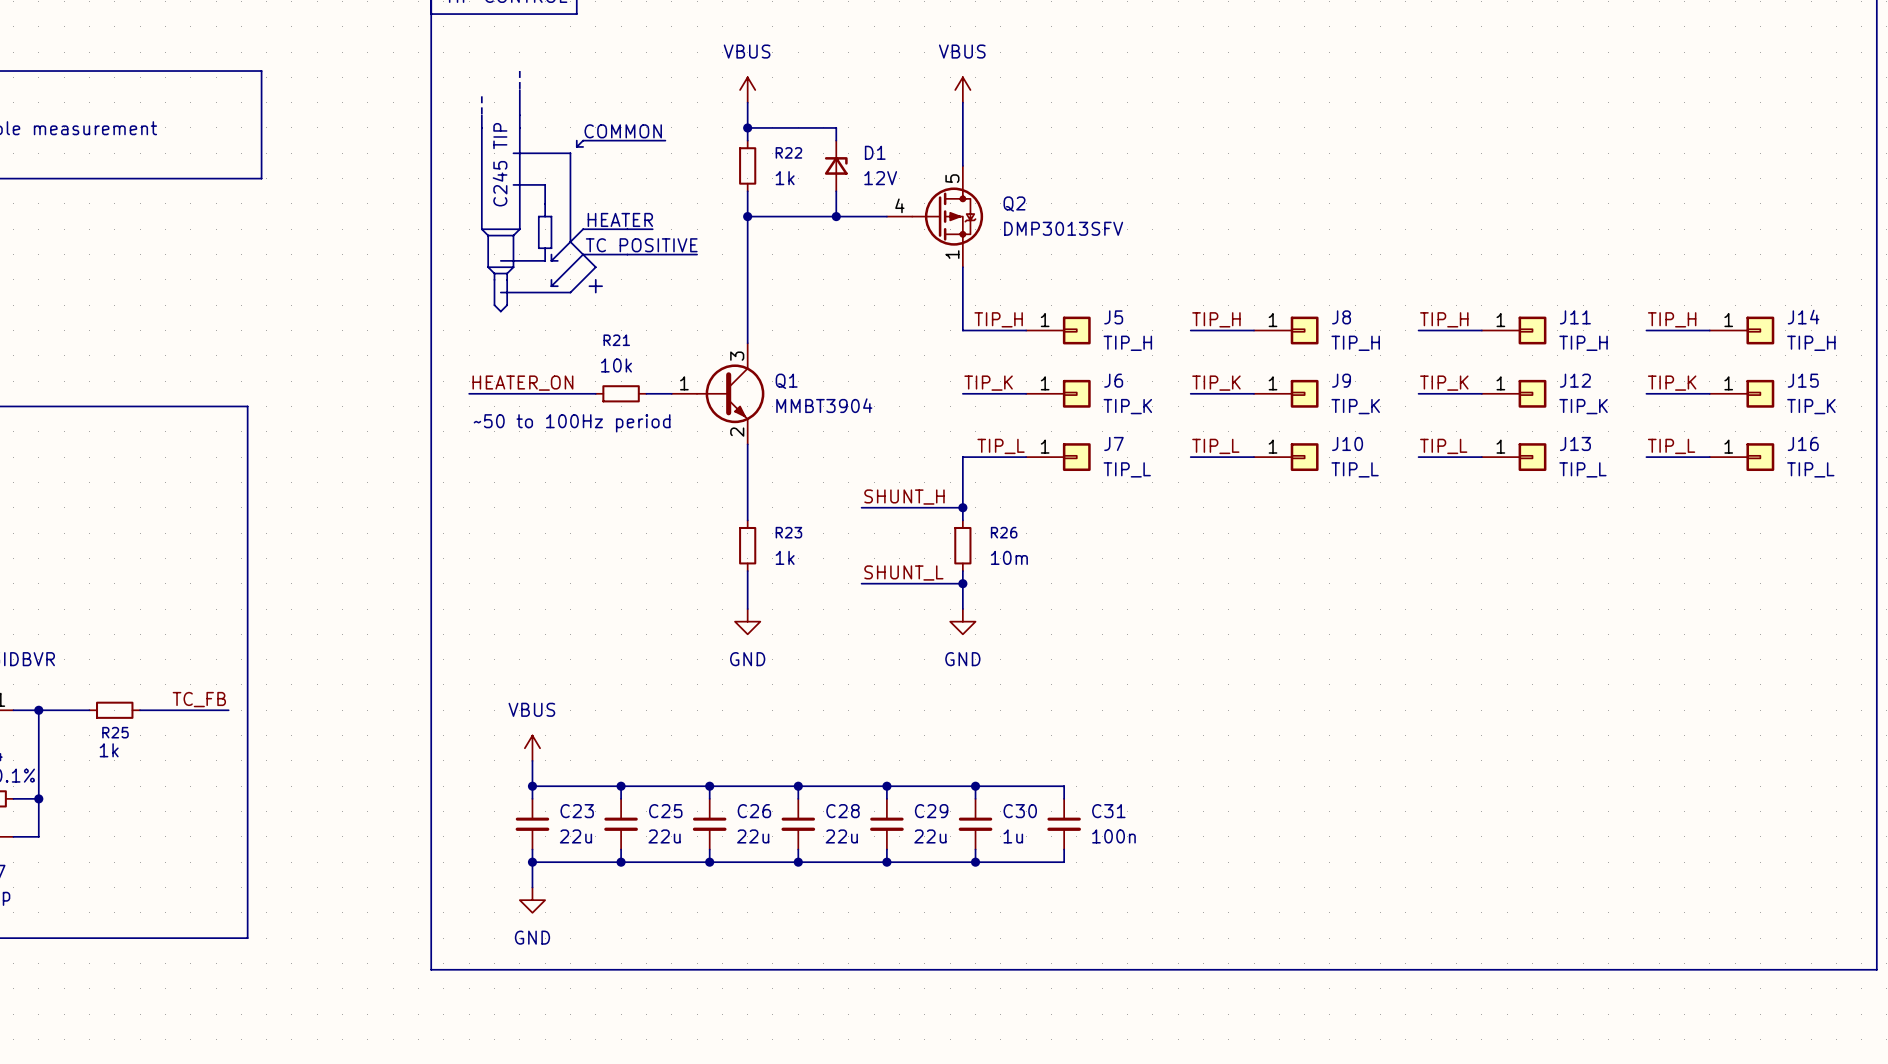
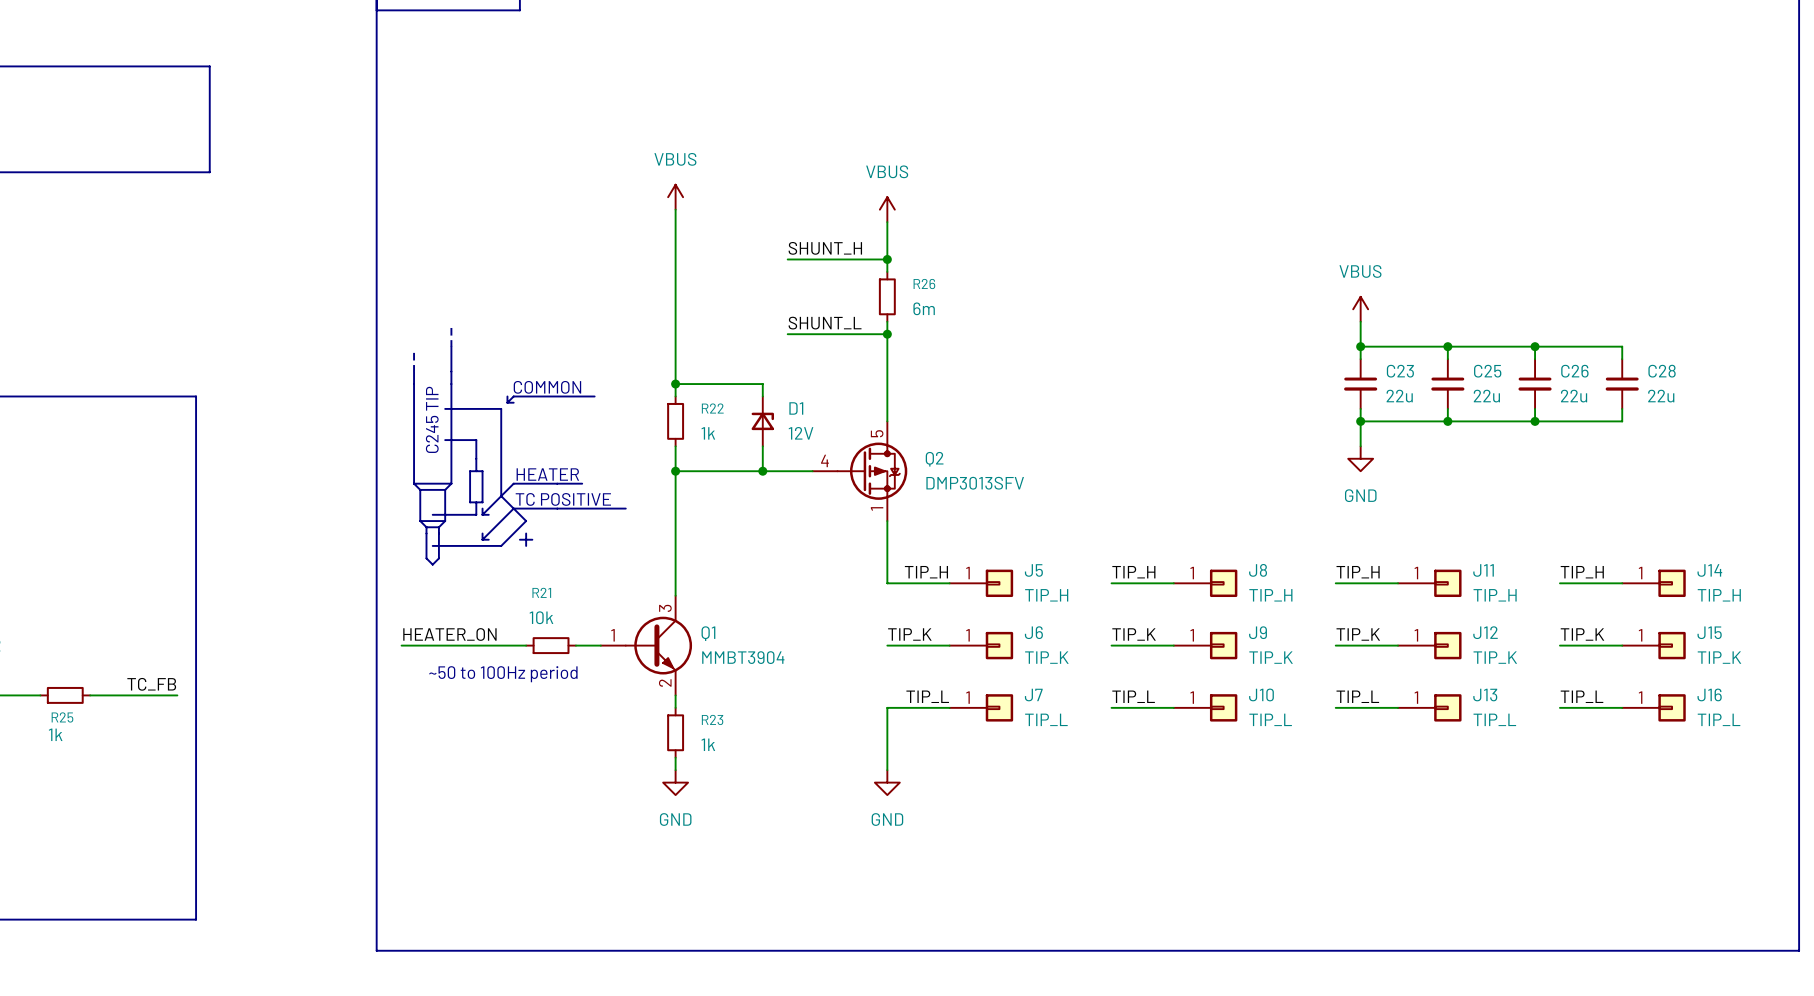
line: (519, 71) (519, 229) -> none
power symbol position: VBUS (747, 89) -> VBUS (675, 197)
power symbol: VBUS (962, 89) -> none
line: (481, 96) (481, 229) -> none
wire: (747, 102) (747, 140) -> none
wire: (962, 102) (962, 165) -> none
wire: (747, 127) (836, 127) (836, 140) -> none
junction: (747, 127) -> none
text: COMMON (623, 131) -> none
line: (576, 140) (576, 146) -> none
line: (665, 140) (583, 140) (576, 146) -> none
line: (576, 146) (583, 146) -> none
line: (513, 153) (570, 153) (570, 241) (595, 267) (570, 292) (500, 292) -> none
text: C245 TIP (500, 164) -> none
R22 position: (747, 165) -> (675, 421)
D1 position: (836, 165) -> (762, 421)
line: (513, 184) (545, 184) (545, 216) -> none
wire: (747, 191) (747, 343) -> none
wire: (836, 191) (836, 216) -> none
line: (538, 216) (538, 248) (551, 248) (551, 216) (538, 216) -> none
wire: none -> (675, 209) (675, 396)
wire: (747, 216) (886, 216) -> none
junction: (747, 216) -> none
junction: (836, 216) -> none
Q2 position: (935, 216) -> (859, 471)
power symbol: none -> VBUS (887, 209)
text: HEATER (620, 219) -> none
line: (481, 229) (519, 229) -> none
line: (481, 229) (488, 235) -> none
line: (519, 229) (513, 235) -> none
line: (652, 229) (583, 229) (551, 260) -> none
wire: none -> (887, 222) (887, 271)
line: (488, 235) (488, 267) -> none
line: (488, 235) (513, 235) -> none
line: (513, 235) (513, 267) -> none
text: TC POSITIVE (641, 245) -> none
line: (545, 248) (545, 260) (500, 260) -> none
line: (551, 254) (551, 260) -> none
line: (697, 254) (583, 254) (551, 286) -> none
line: (551, 260) (557, 260) -> none
line: (488, 267) (494, 273) -> (414, 483) (420, 489)
line: (488, 267) (513, 267) -> (420, 489) (445, 489)
line: (513, 267) (507, 273) -> (451, 483) (445, 489)
junction: none -> (887, 259)
wire: (962, 267) (962, 330) (1026, 330) -> none
line: (494, 273) (507, 273) -> none
line: (494, 273) (494, 305) (500, 311) (507, 305) (507, 273) -> none
line: (551, 279) (551, 286) -> (507, 396) (507, 402)
line: (595, 279) (595, 292) -> none
line: (551, 286) (557, 286) -> (507, 402) (513, 402)
line: (589, 286) (602, 286) -> none
power symbol: none -> VBUS (1360, 309)
label: TIP_H (998, 319) -> none
label: TIP_H (1216, 319) -> none
label: TIP_H (1444, 319) -> none
label: TIP_H (1672, 319) -> none
wire: none -> (887, 321) (887, 421)
J5 position: (1058, 330) -> (981, 583)
wire: (1190, 330) (1254, 330) -> none
J8 position: (1286, 330) -> (1205, 583)
wire: (1418, 330) (1481, 330) -> none
wire: none -> (1360, 321) (1360, 359)
J11 position: (1514, 330) -> (1429, 583)
wire: (1646, 330) (1709, 330) -> none
J14 position: (1742, 330) -> (1653, 583)
line: none -> (451, 327) (451, 483)
junction: none -> (887, 334)
wire: none -> (1360, 346) (1622, 346) (1622, 359)
junction: none -> (1360, 346)
wire: none -> (1447, 346) (1447, 359)
junction: none -> (1447, 346)
wire: none -> (1535, 346) (1535, 359)
junction: none -> (1535, 346)
line: none -> (414, 352) (414, 483)
label: HEATER_ON (522, 383) -> none
label: TIP_K (988, 383) -> none
label: TIP_K (1216, 383) -> none
label: TIP_K (1444, 383) -> none
label: TIP_K (1672, 383) -> none
wire: (469, 393) (595, 393) -> none
R21 position: (621, 393) -> (551, 645)
wire: (646, 393) (671, 393) -> none
Q1 position: (718, 393) -> (646, 645)
wire: none -> (675, 384) (762, 384) (762, 396)
junction: none -> (675, 384)
wire: (962, 393) (1026, 393) -> none
J6 position: (1058, 393) -> (981, 645)
wire: (1190, 393) (1254, 393) -> (1111, 583) (1173, 583)
J9 position: (1286, 393) -> (1205, 645)
wire: (1418, 393) (1481, 393) -> (1335, 583) (1398, 583)
J12 position: (1514, 393) -> (1429, 645)
wire: (1646, 393) (1709, 393) -> (1559, 583) (1622, 583)
J15 position: (1742, 393) -> (1653, 645)
text: none -> COMMON (547, 387)
line: none -> (594, 396) (513, 396) (507, 402)
line: none -> (445, 408) (501, 408) (501, 496) (526, 521) (501, 545) (432, 545)
wire: none -> (1360, 408) (1360, 446)
wire: none -> (1447, 408) (1447, 421)
wire: none -> (1535, 408) (1535, 421)
wire: none -> (1622, 408) (1622, 421) (1360, 421)
text: ~50 to 100Hz period (572, 423) -> none
text: none -> C245 TIP (432, 419)
junction: none -> (1360, 421)
junction: none -> (1447, 421)
junction: none -> (1535, 421)
wire: (747, 444) (747, 520) -> none
label: TIP_L (1001, 446) -> none
label: TIP_L (1215, 446) -> none
label: TIP_L (1443, 446) -> none
label: TIP_L (1671, 446) -> none
line: none -> (445, 440) (476, 440) (476, 471)
wire: none -> (675, 446) (675, 595)
wire: none -> (762, 446) (762, 471)
wire: (1026, 457) (962, 457) (962, 520) -> none
J7 position: (1058, 457) -> (981, 707)
wire: (1190, 457) (1254, 457) -> (1111, 645) (1173, 645)
J10 position: (1286, 457) -> (1205, 707)
wire: (1418, 457) (1481, 457) -> (1335, 645) (1398, 645)
J13 position: (1514, 457) -> (1429, 707)
wire: (1646, 457) (1709, 457) -> (1559, 645) (1622, 645)
J16 position: (1742, 457) -> (1653, 707)
power symbol: none -> GND (1360, 458)
line: none -> (470, 471) (470, 502) (482, 502) (482, 471) (470, 471)
wire: none -> (675, 471) (812, 471)
junction: none -> (675, 471)
junction: none -> (762, 471)
text: none -> HEATER (547, 474)
line: none -> (414, 483) (451, 483)
line: none -> (582, 483) (513, 483) (482, 514)
label position: SHUNT_H (904, 497) -> SHUNT_H (825, 248)
line: none -> (420, 489) (420, 521)
line: none -> (445, 489) (445, 521)
wire: (861, 507) (962, 507) -> (787, 259) (887, 259)
junction: (962, 507) -> none
text: none -> TC POSITIVE (563, 499)
line: none -> (476, 502) (476, 514) (432, 514)
line: none -> (482, 508) (482, 514)
line: none -> (625, 508) (513, 508) (482, 539)
line: none -> (482, 514) (488, 514)
line: none -> (420, 521) (445, 521)
line: none -> (420, 521) (426, 527)
line: none -> (445, 521) (438, 527)
wire: none -> (887, 521) (887, 583) (949, 583)
line: none -> (426, 527) (438, 527)
line: none -> (426, 527) (426, 558) (432, 564) (438, 558) (438, 527)
line: none -> (482, 533) (482, 539)
line: none -> (526, 533) (526, 545)
R23 position: (747, 545) -> (675, 732)
R26 position: (962, 545) -> (887, 296)
line: none -> (482, 539) (488, 539)
line: none -> (519, 539) (532, 539)
R26 value: 10m (1009, 557) -> 6m (924, 308)
wire: (747, 571) (747, 609) -> none
wire: (962, 571) (962, 609) -> none
label position: SHUNT_L (903, 572) -> SHUNT_L (825, 323)
wire: (861, 583) (962, 583) -> (787, 334) (887, 334)
junction: (962, 583) -> none
label: none -> TIP_H (926, 572)
label: none -> TIP_H (1133, 572)
label: none -> TIP_H (1358, 572)
label: none -> TIP_H (1582, 572)
power symbol: GND (747, 621) -> none
power symbol: GND (962, 621) -> none
label: none -> HEATER_ON (449, 634)
label: none -> TIP_K (909, 634)
label: none -> TIP_K (1134, 634)
label: none -> TIP_K (1358, 634)
label: none -> TIP_K (1582, 634)
wire: none -> (401, 645) (526, 645)
wire: none -> (575, 645) (600, 645)
wire: none -> (887, 645) (949, 645)
text: none -> ~50 to 100Hz period (503, 674)
label: none -> TIP_L (927, 696)
label: none -> TIP_L (1133, 696)
label: none -> TIP_L (1357, 696)
label: none -> TIP_L (1582, 696)
wire: none -> (949, 707) (887, 707) (887, 770)
wire: none -> (1111, 707) (1173, 707)
wire: none -> (1335, 707) (1398, 707)
wire: none -> (1559, 707) (1622, 707)
power symbol: VBUS (532, 748) -> none
wire: (532, 760) (532, 798) -> none
wire: (532, 786) (1064, 786) (1064, 798) -> none
junction: (532, 786) -> none
wire: (621, 786) (621, 798) -> none
junction: (621, 786) -> none
wire: (709, 786) (709, 798) -> (675, 695) (675, 707)
junction: (709, 786) -> none
wire: (798, 786) (798, 798) -> none
junction: (798, 786) -> none
wire: (886, 786) (886, 798) -> none
junction: (886, 786) -> none
wire: (975, 786) (975, 798) -> none
junction: (975, 786) -> none
power symbol: none -> GND (675, 782)
power symbol: none -> GND (887, 782)
C23 position: (532, 824) -> (1360, 384)
C25 position: (621, 824) -> (1447, 384)
C26 position: (709, 824) -> (1535, 384)
C28 position: (798, 824) -> (1622, 384)
C29: 22u (886, 824) -> none
C30: 1u (975, 824) -> none
C31: 100n (1064, 824) -> none
wire: (532, 849) (532, 887) -> none
wire: (621, 849) (621, 862) -> none
wire: (709, 849) (709, 862) -> (675, 757) (675, 770)
wire: (798, 849) (798, 862) -> none
wire: (886, 849) (886, 862) -> none
wire: (975, 849) (975, 862) -> none
wire: (1064, 849) (1064, 862) (532, 862) -> none
junction: (532, 862) -> none
junction: (621, 862) -> none
junction: (709, 862) -> none
junction: (798, 862) -> none
junction: (886, 862) -> none
junction: (975, 862) -> none
power symbol: GND (532, 900) -> none

